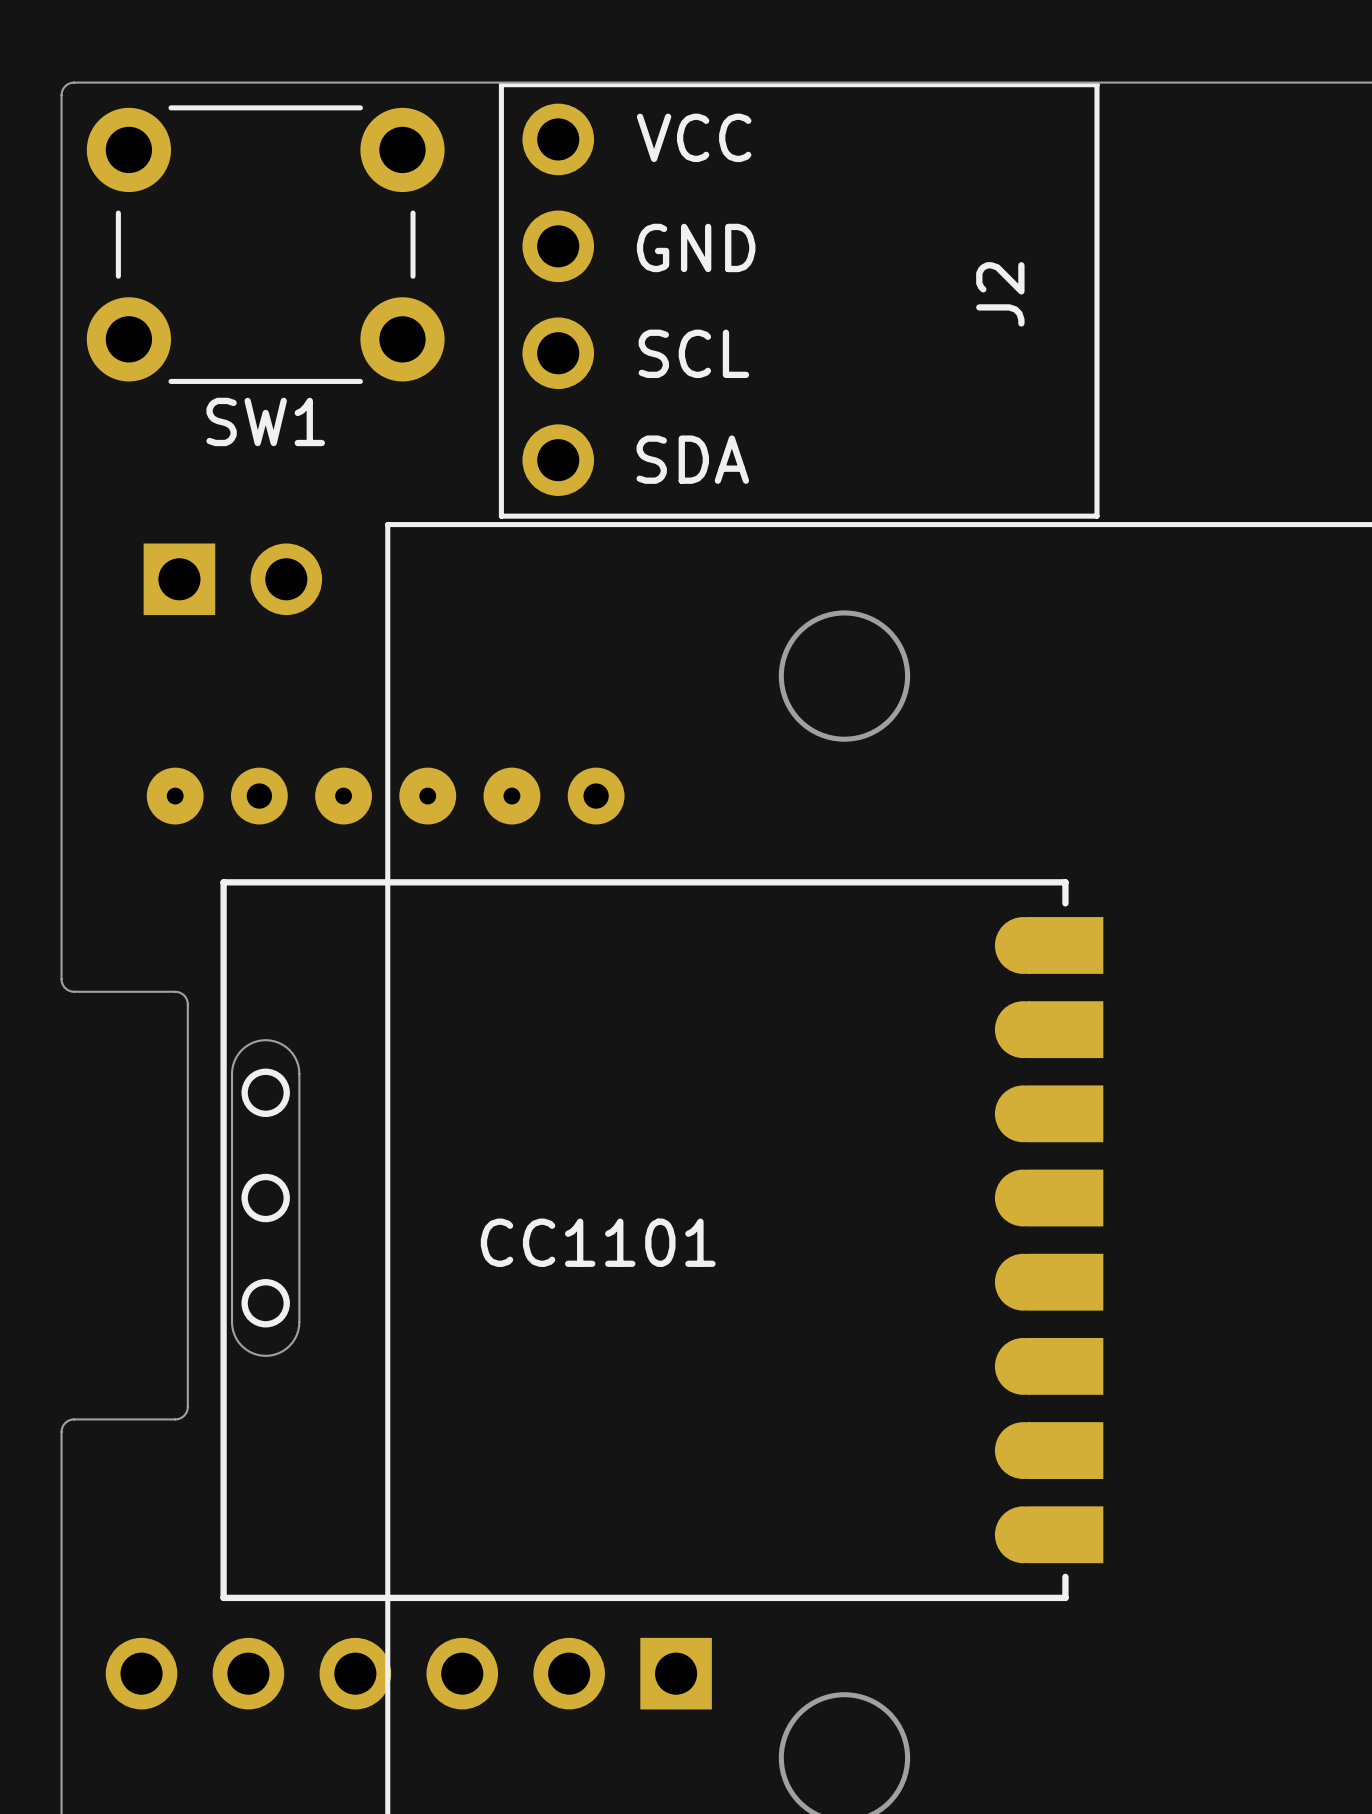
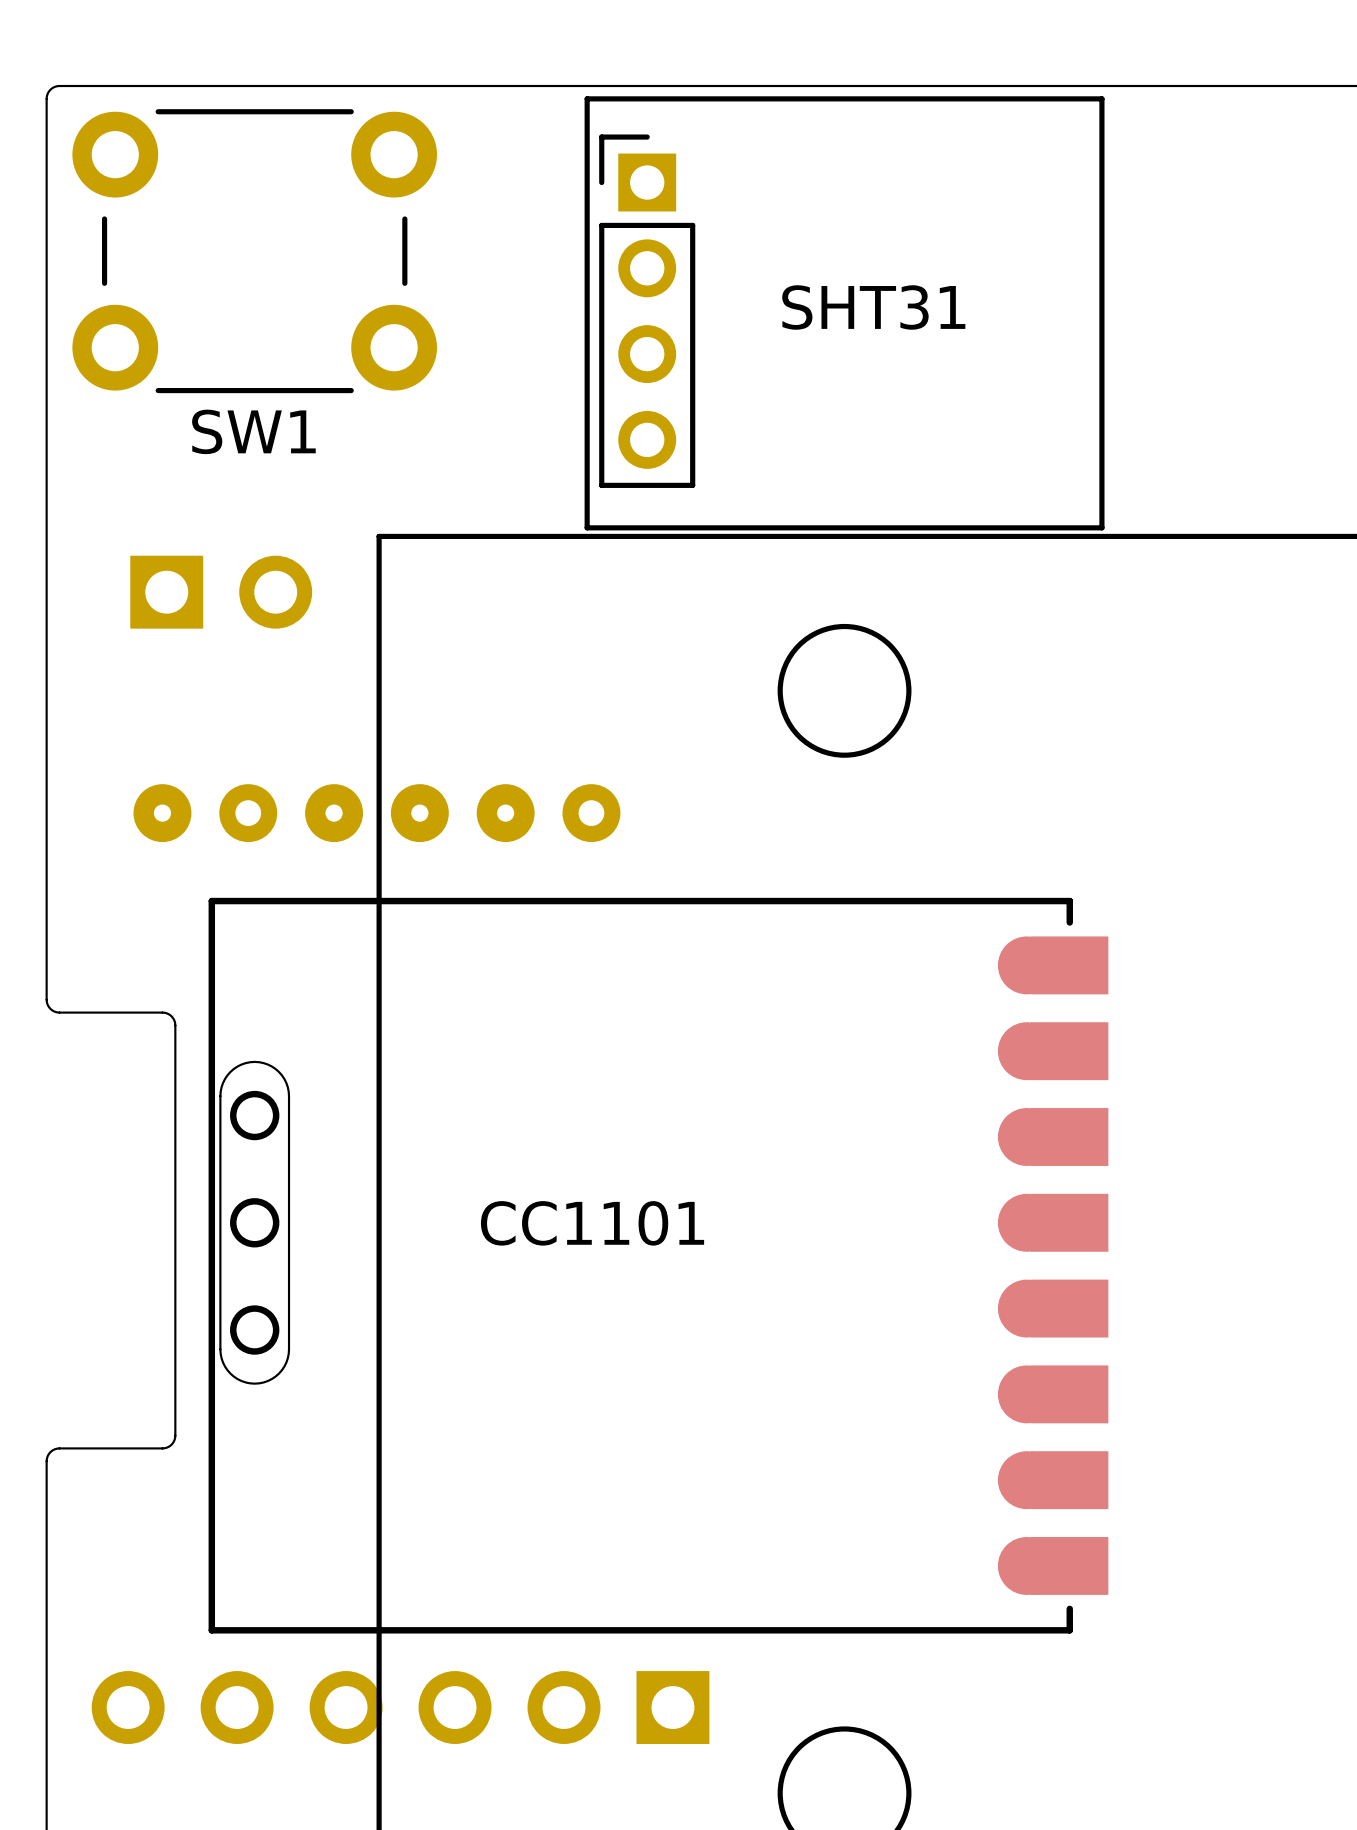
line: (1097, 95) (1097, 84) (501, 84) (501, 516) (591, 516) -> (1101, 98) (587, 98) (587, 527)
J2: (558, 299) -> none
part: none -> SHT31 (647, 311)
part value position: CC1101 (598, 1242) -> CC1101 (592, 1223)

